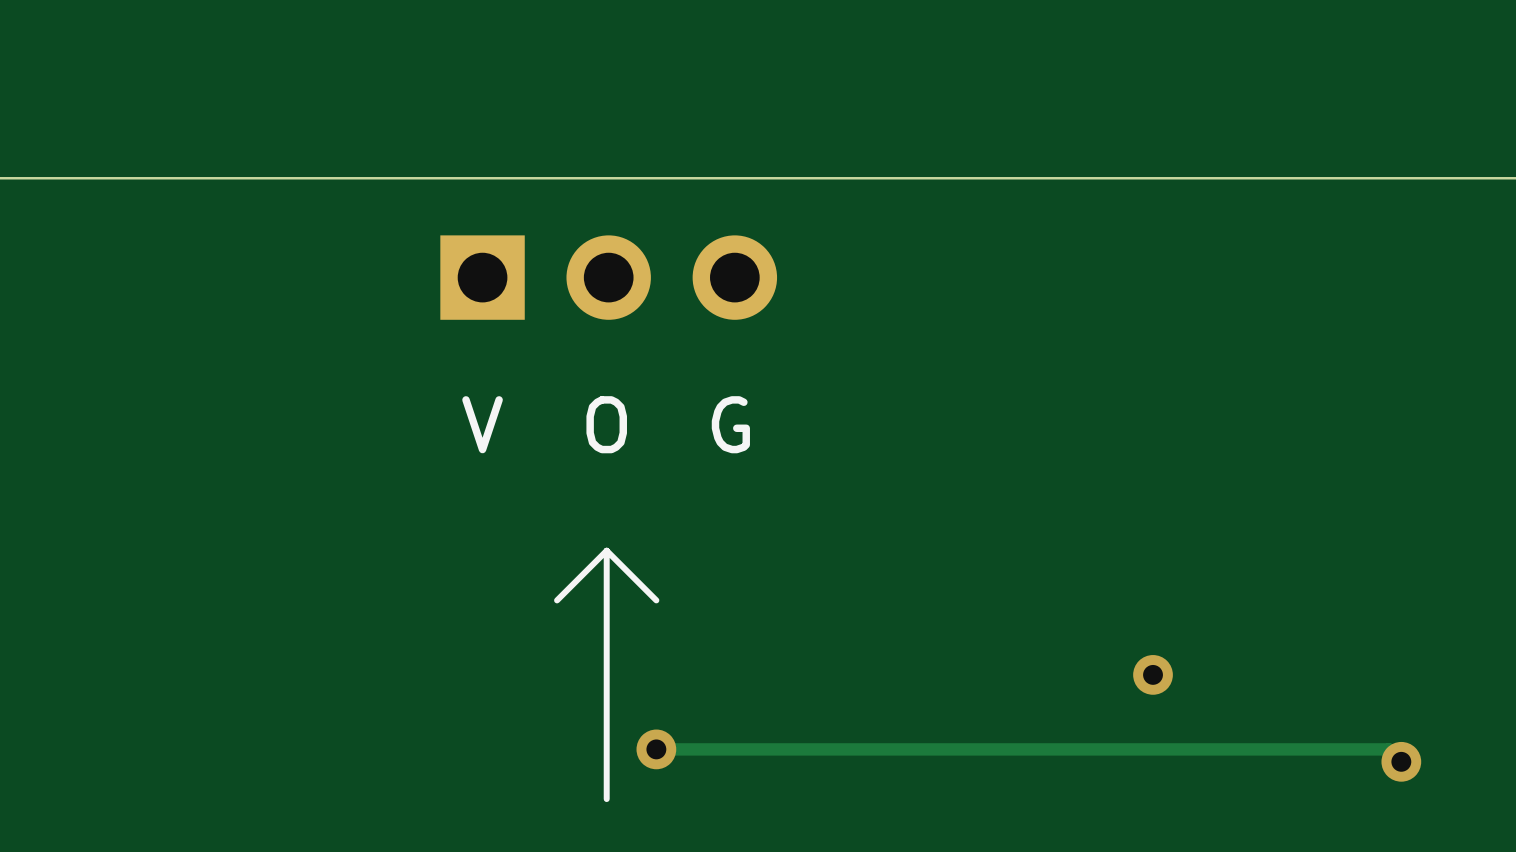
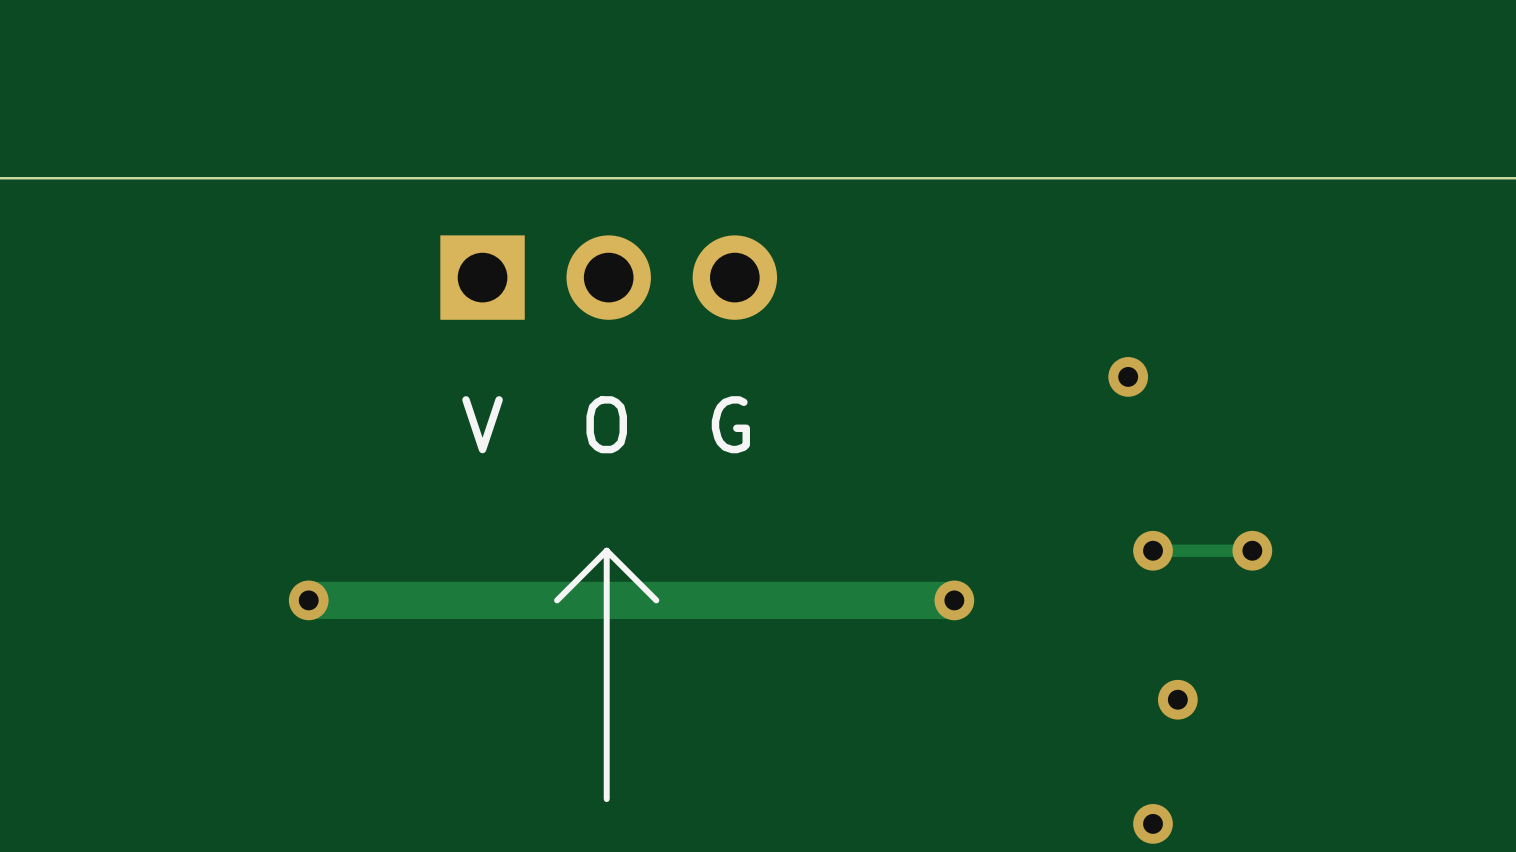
via: none -> (1128, 376)
via: none -> (1153, 550)
track: none -> (1252, 550) (1153, 550)
via: none -> (1252, 550)
via: none -> (308, 600)
track: none -> (954, 600) (308, 600)
via: none -> (954, 600)
via position: (1153, 674) -> (1177, 699)
track: (656, 749) (1388, 749) (1401, 761) -> none
via: (656, 749) -> none
via: (1401, 761) -> none
via: none -> (1153, 823)

